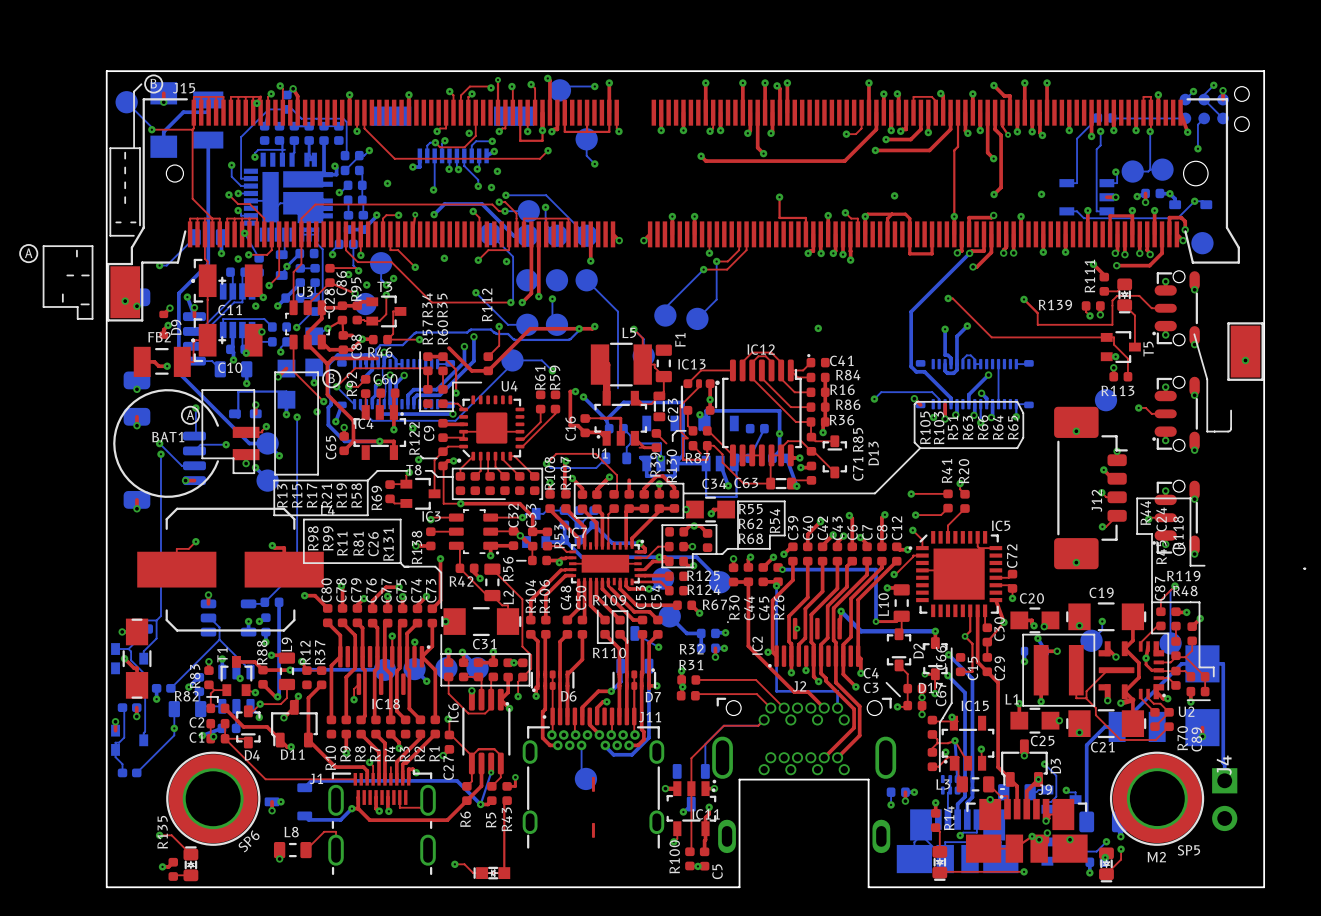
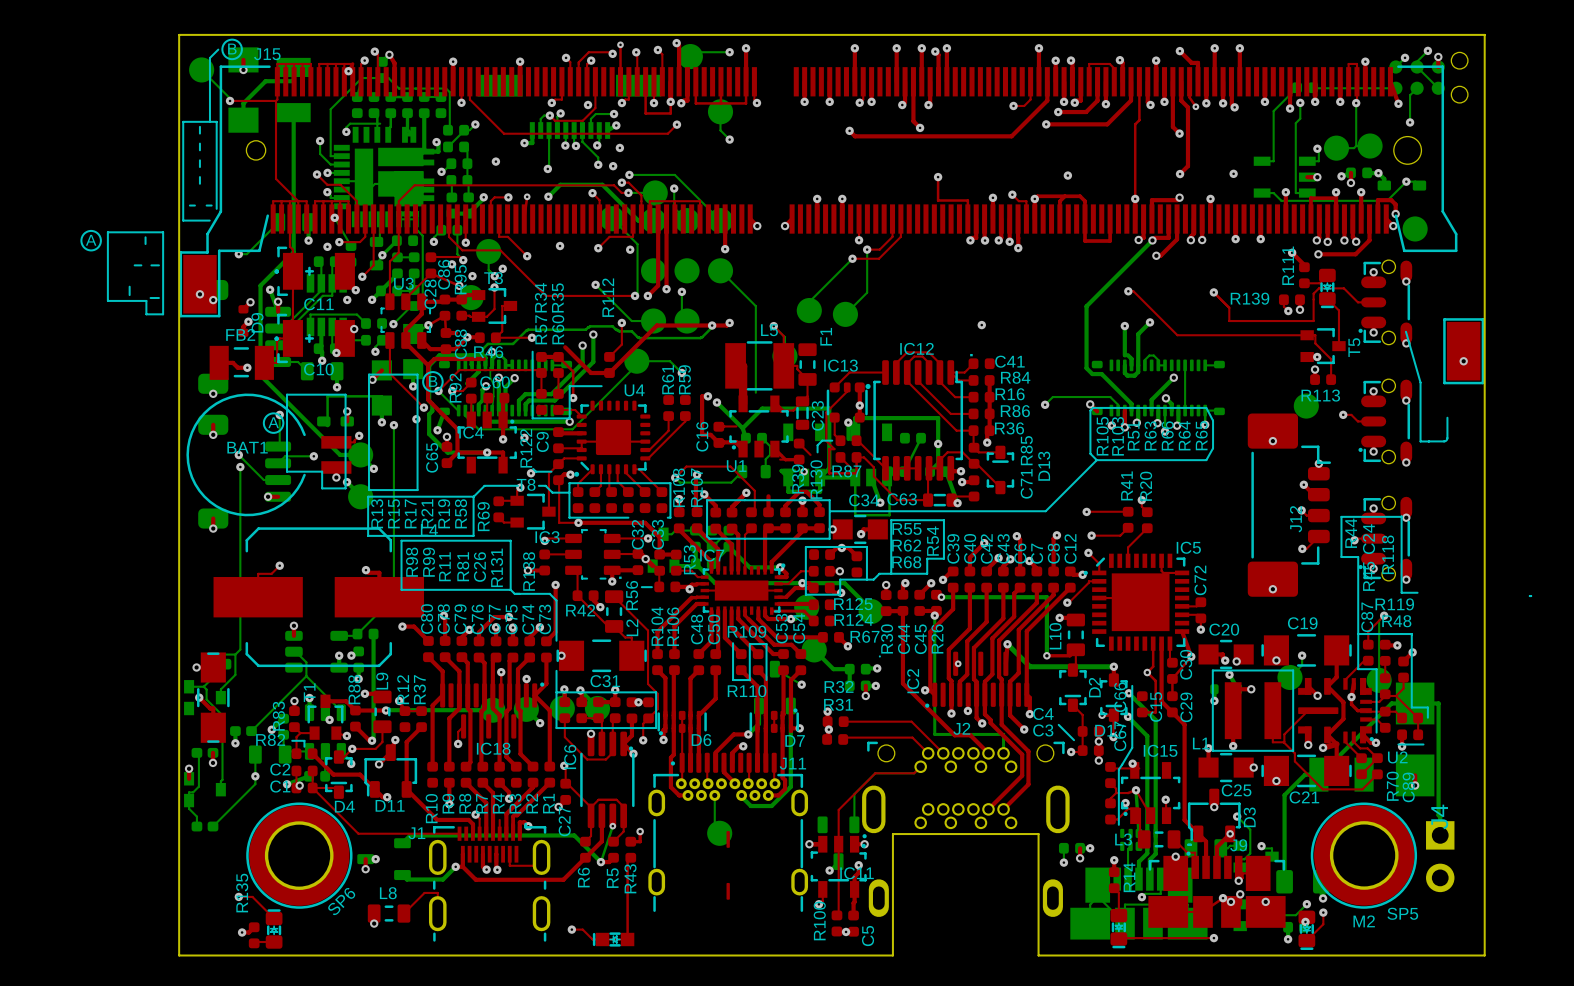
top track: (600, 418) (620, 418) (620, 438) -> none
bottom track: (640, 443) (660, 443) (660, 458) -> none
top track: (634, 685) (634, 716) -> none

